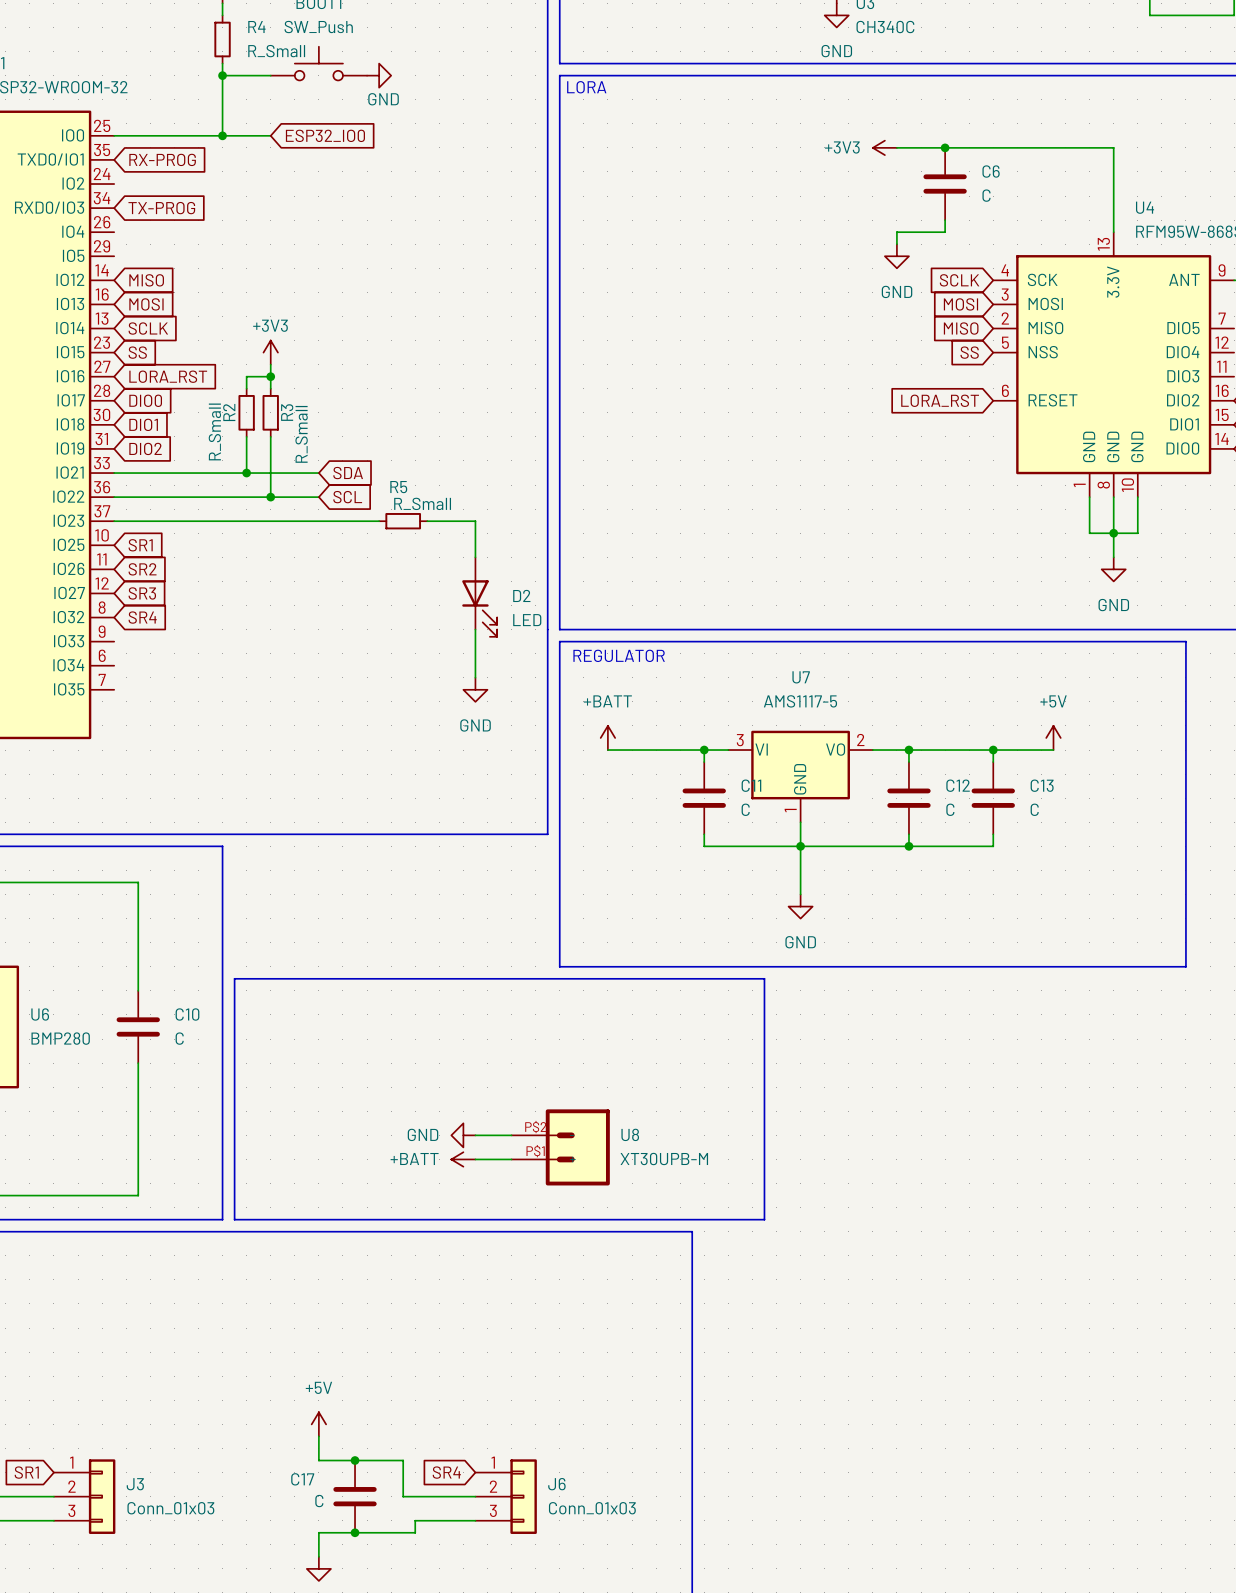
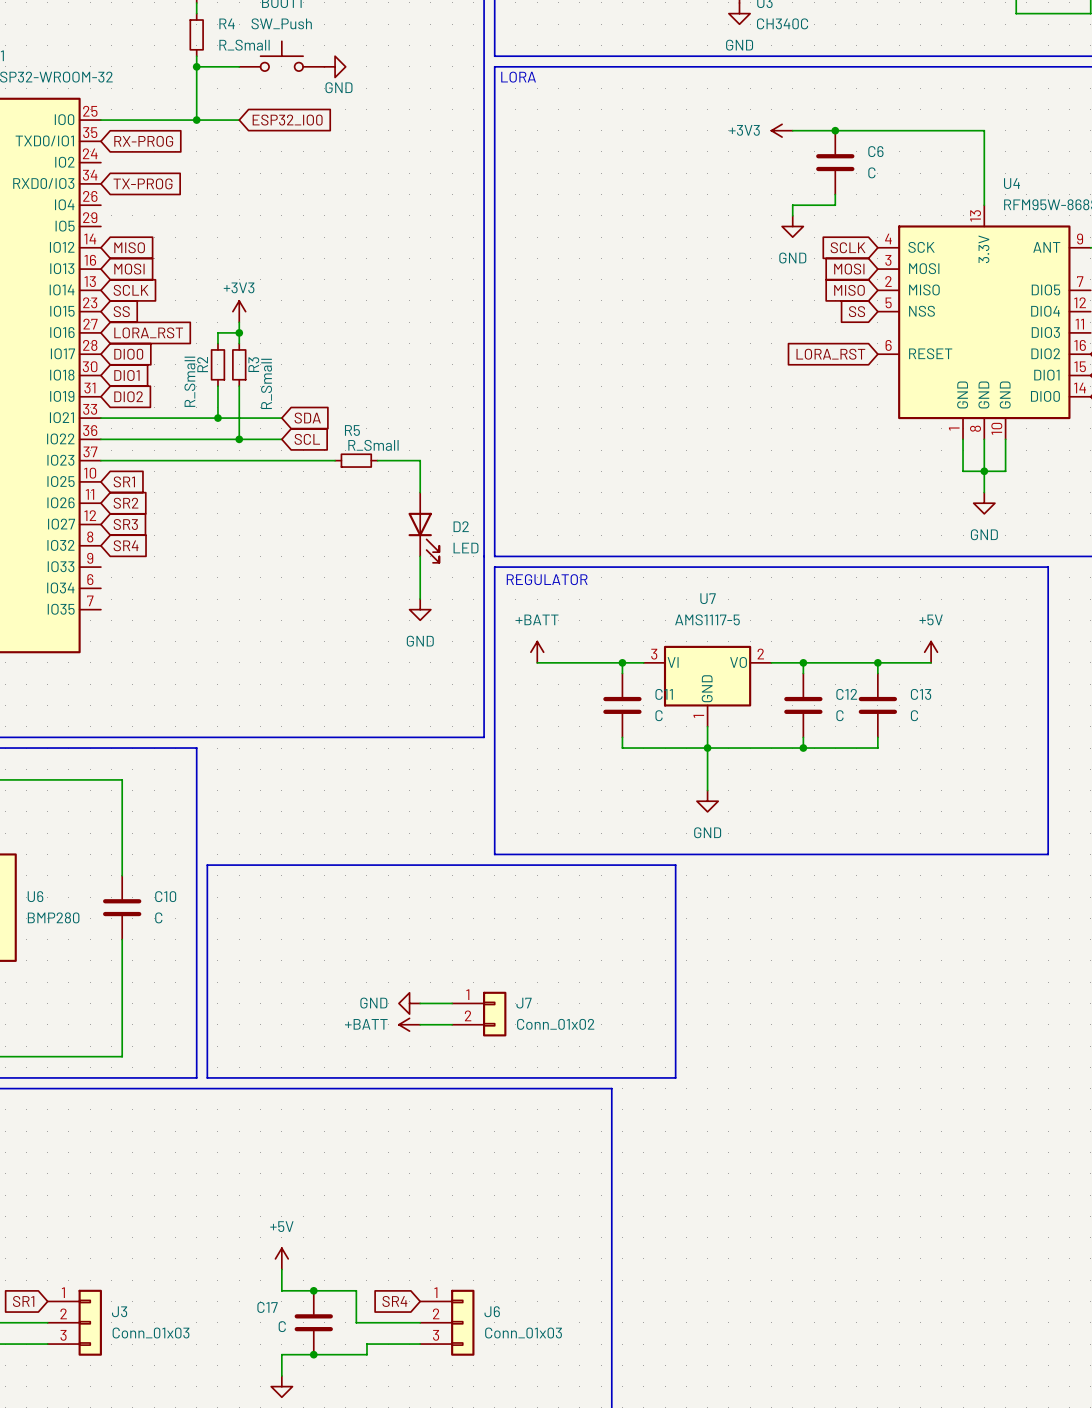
J7: none -> Conn_01x02 (479, 1014)
U8: XT30UPB-M (560, 1147) -> none

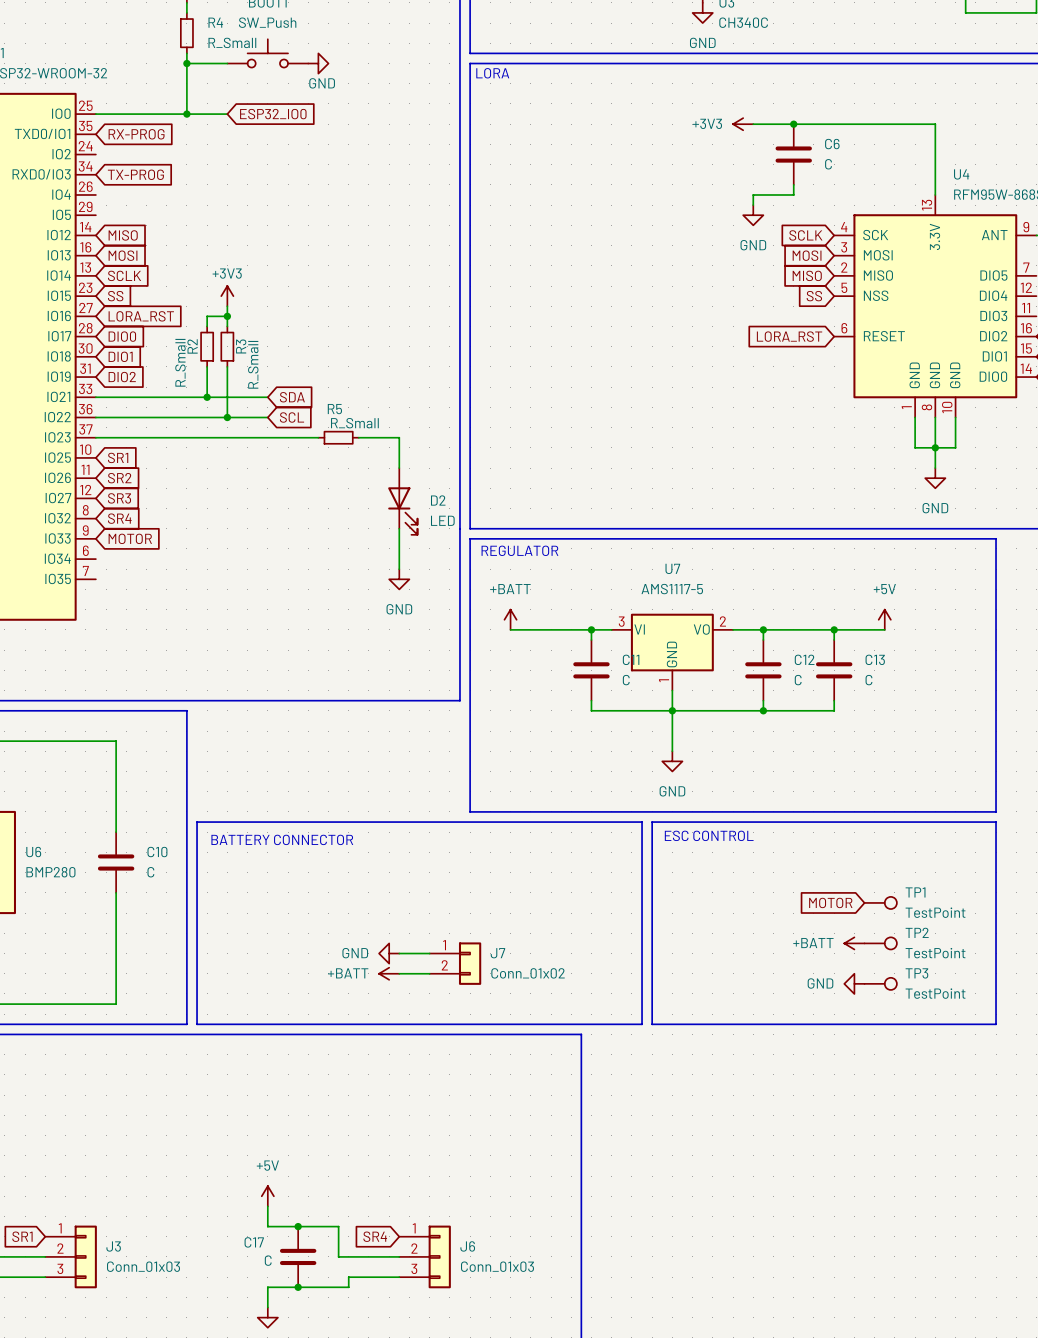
global label: none -> MOTOR (130, 538)
line: none -> (652, 822) (996, 822) (996, 1024) (652, 1024) (652, 822)
text: none -> ESC CONTROL (709, 835)
text: none -> BATTERY CONNECTOR (282, 839)
global label: none -> MOTOR (830, 902)
TP1: none -> TestPoint (880, 902)
power symbol: none -> +BATT (854, 943)
TP2: none -> TestPoint (880, 943)
power symbol: none -> GND (854, 983)
TP3: none -> TestPoint (880, 983)

